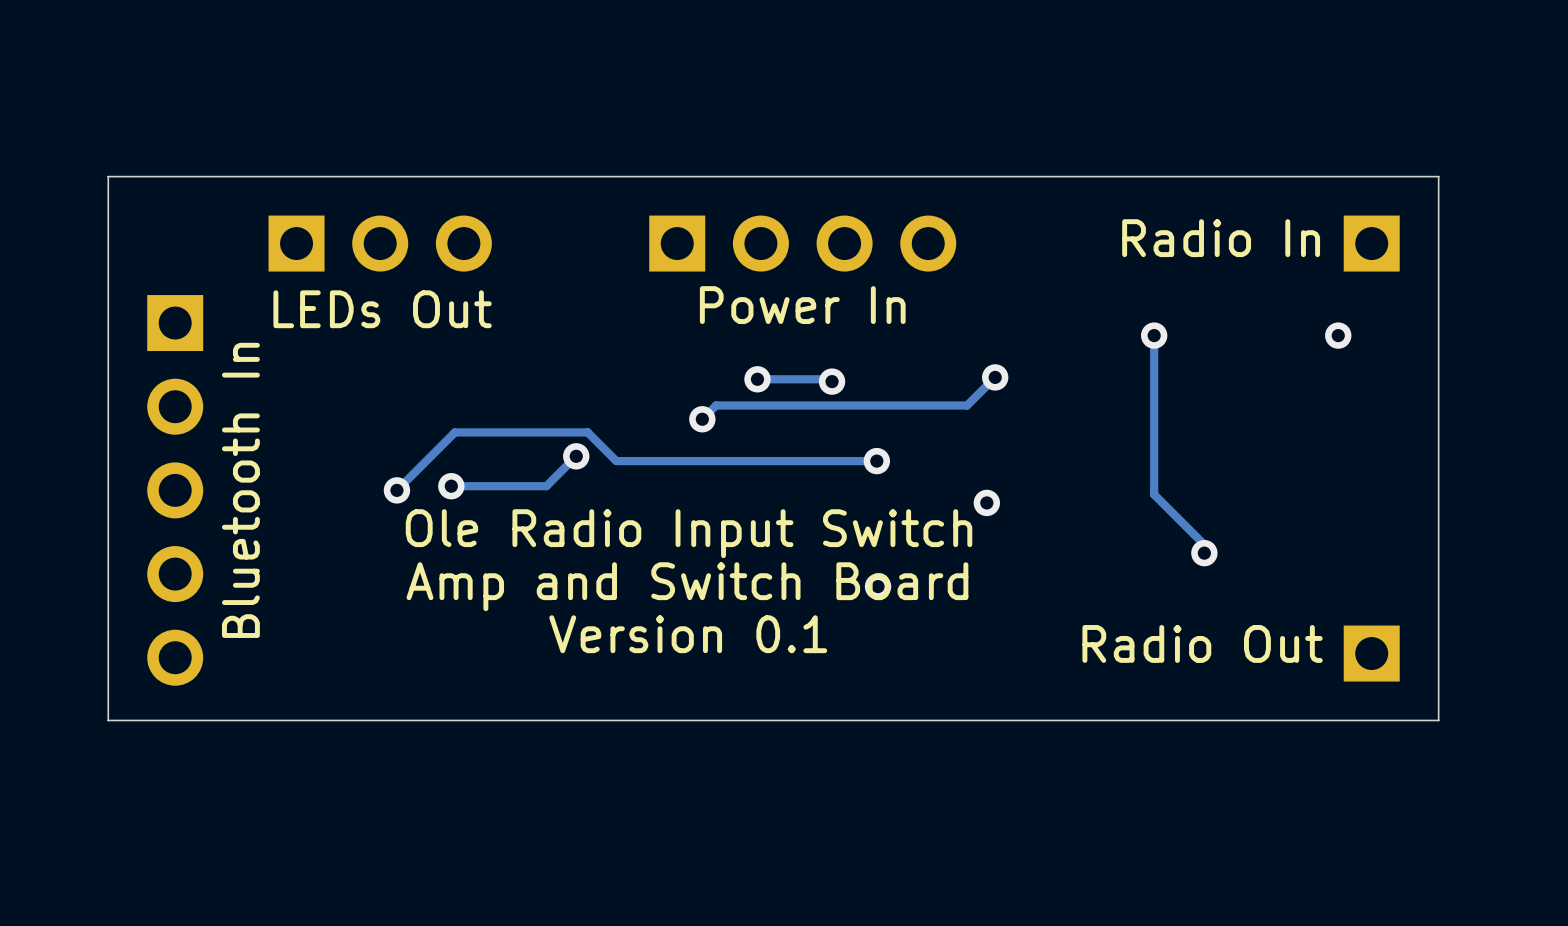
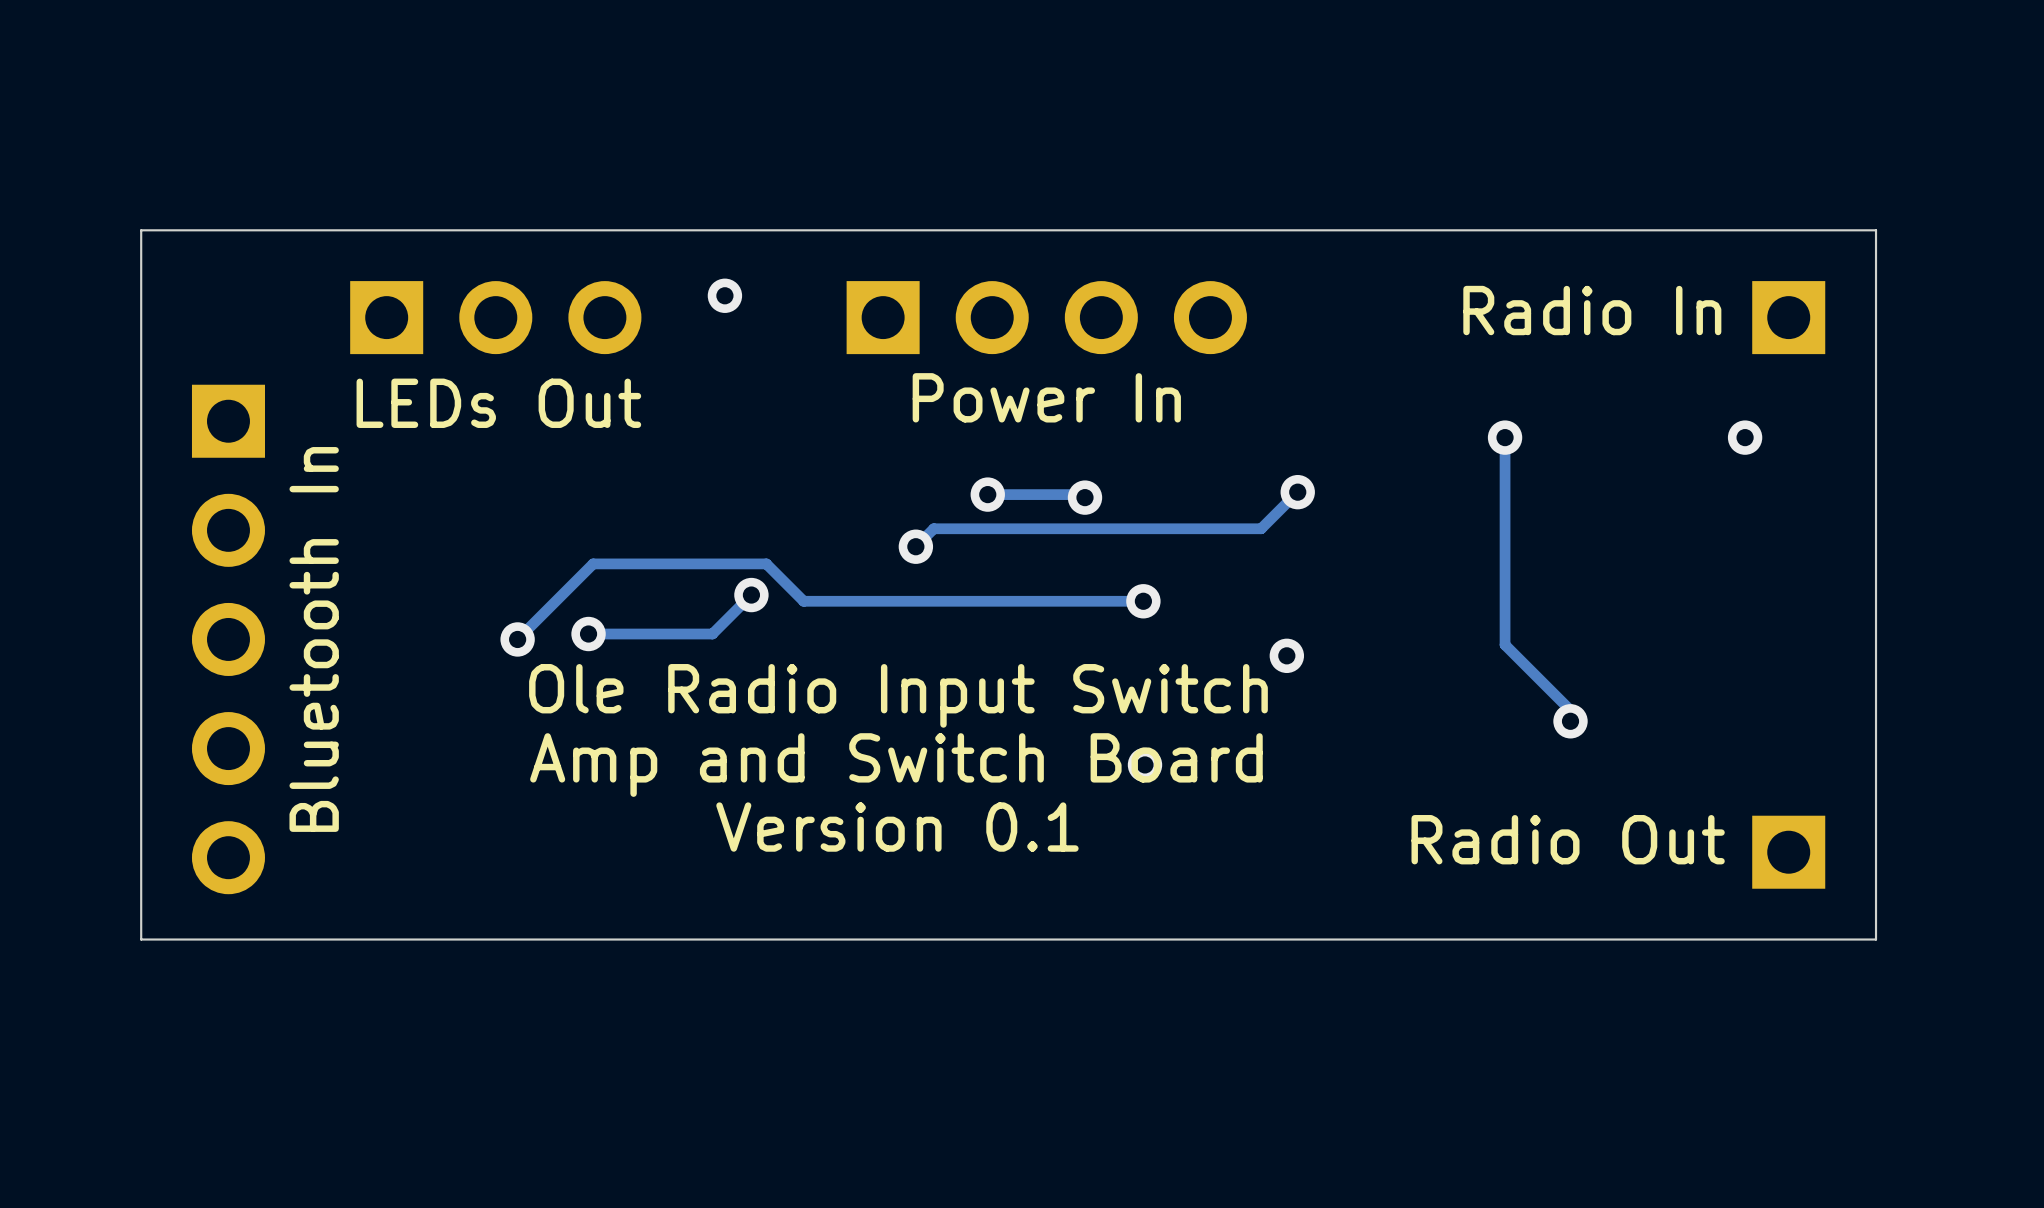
via: none -> (724, 295)

